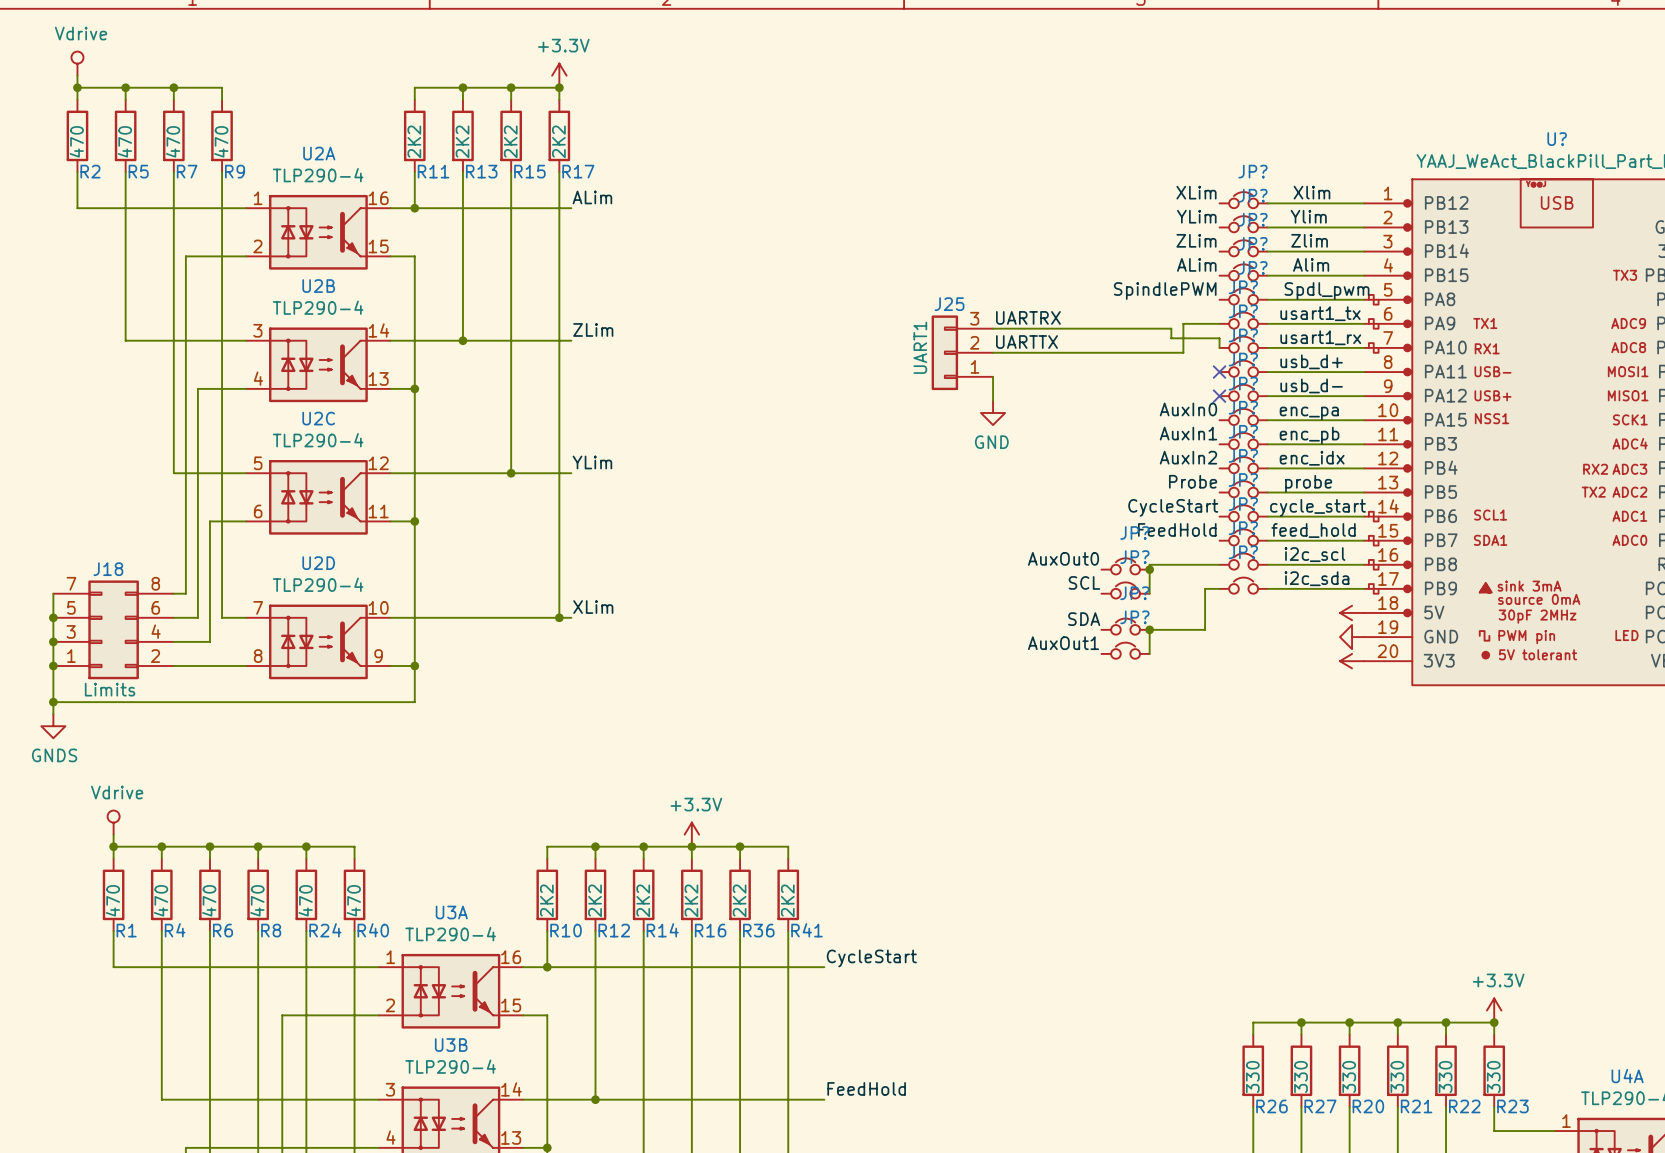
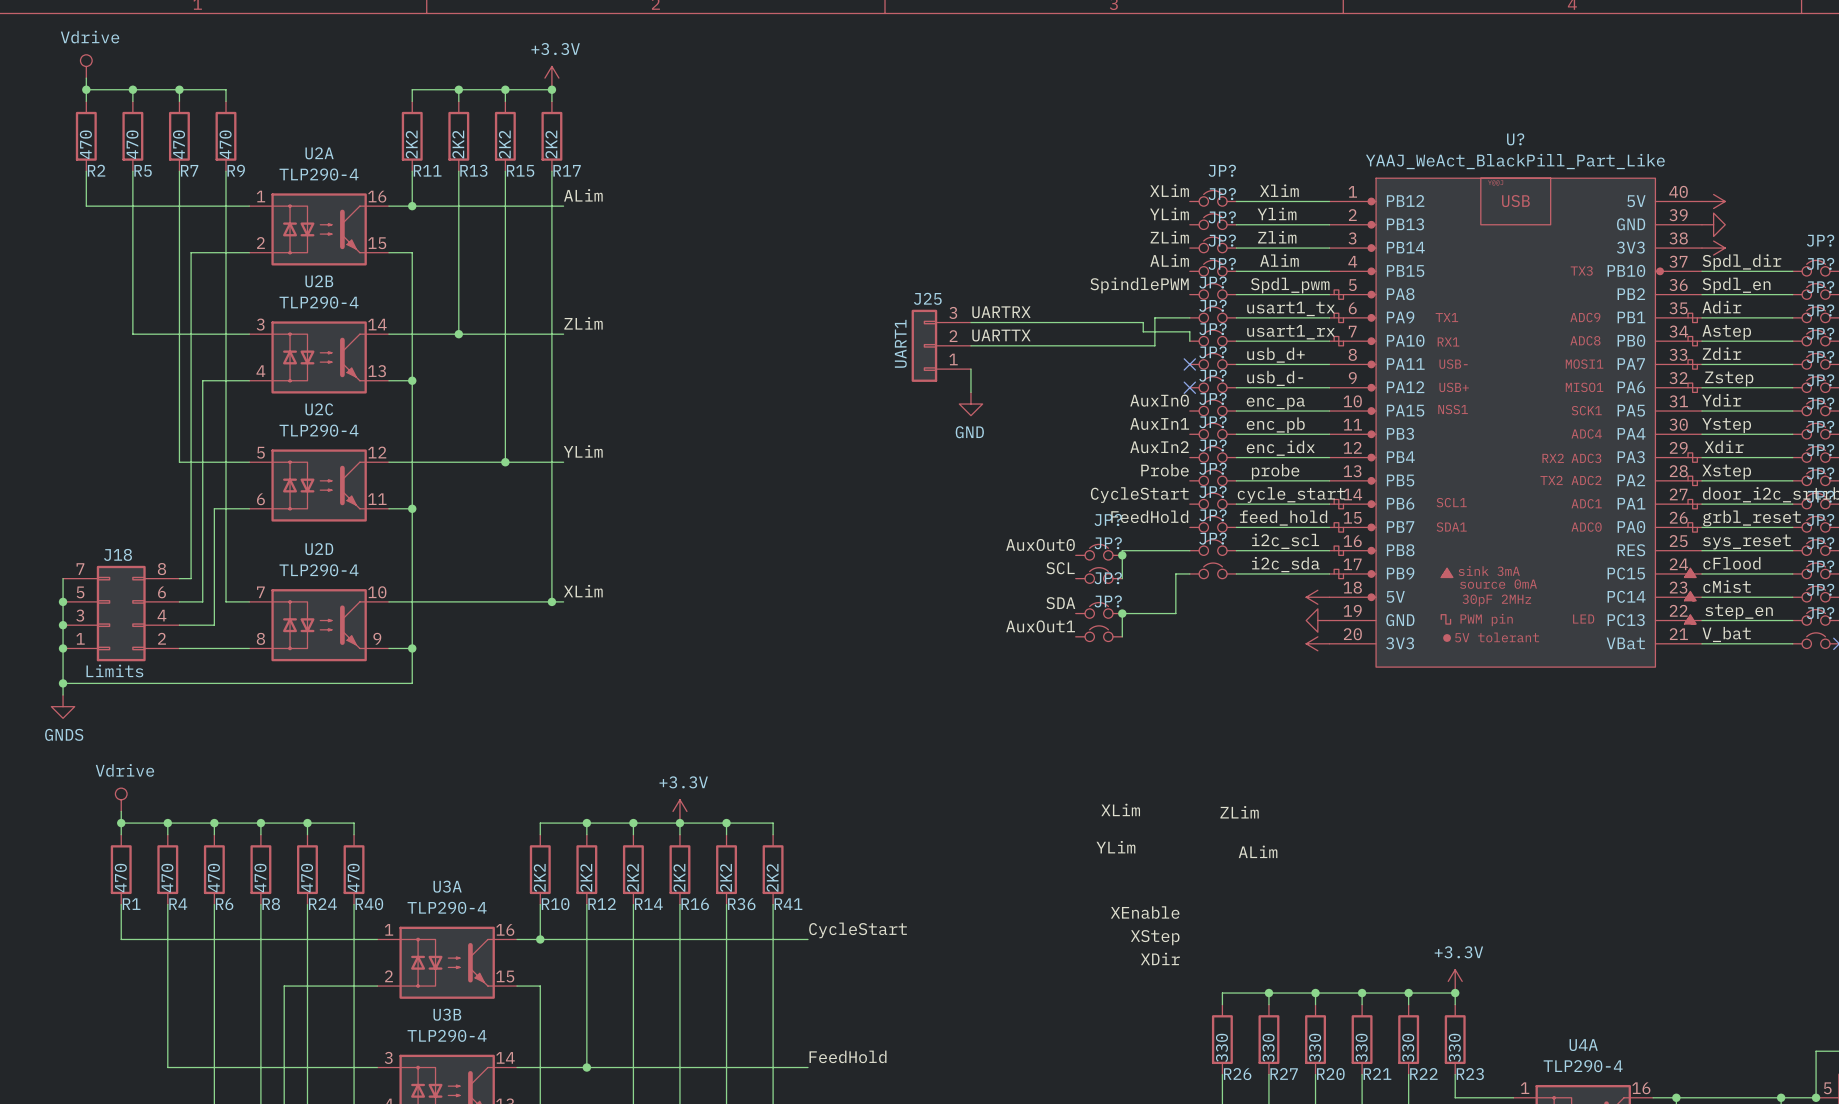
label: none -> XLim (1120, 809)
label: none -> ZLim (1239, 812)
label: none -> YLim (1115, 847)
label: none -> ALim (1258, 851)
label: none -> XEnable (1145, 912)
label: none -> XStep (1155, 937)
label: none -> XDir (1160, 958)

